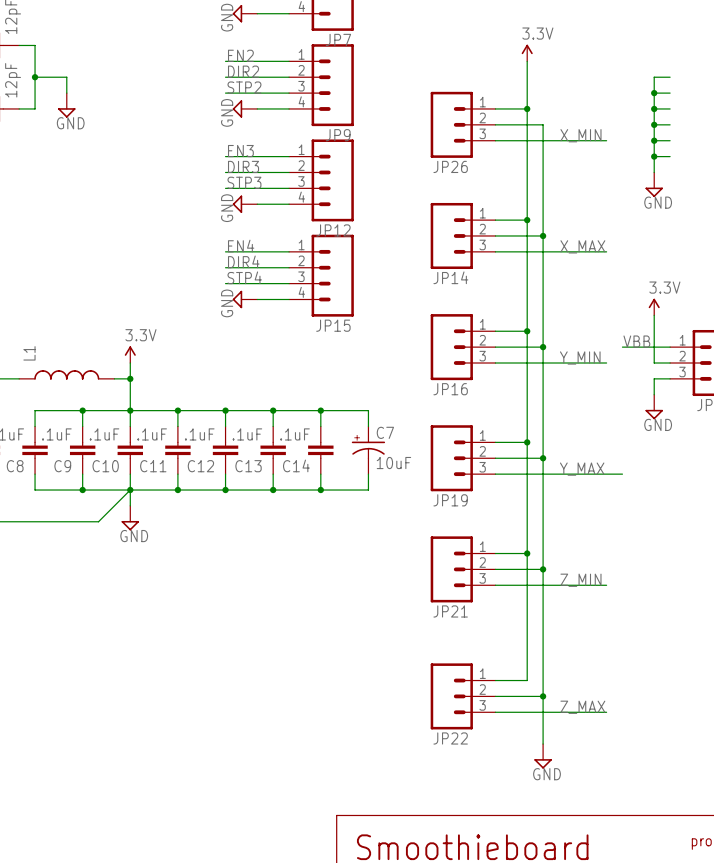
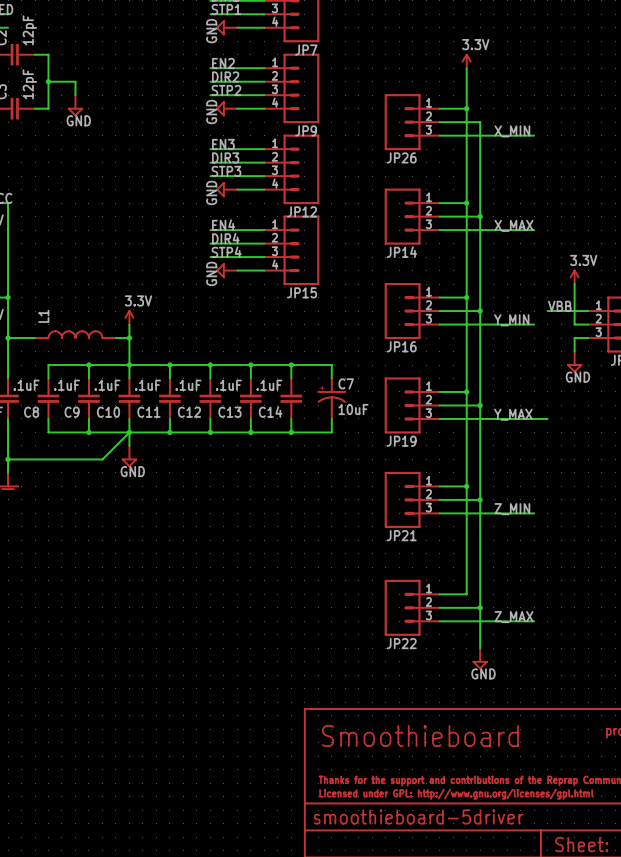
wire: (670, 77) (654, 77) (654, 172) -> none
wire: (654, 93) (670, 93) -> none
junction: (654, 93) -> none
wire: (654, 108) (670, 108) -> none
junction: (654, 108) -> none
wire: (654, 124) (670, 124) -> none
junction: (654, 124) -> none
wire: (654, 140) (670, 140) -> none
junction: (654, 140) -> none
wire: (654, 156) (670, 156) -> none
junction: (654, 156) -> none
power symbol: GND (654, 184) -> none

